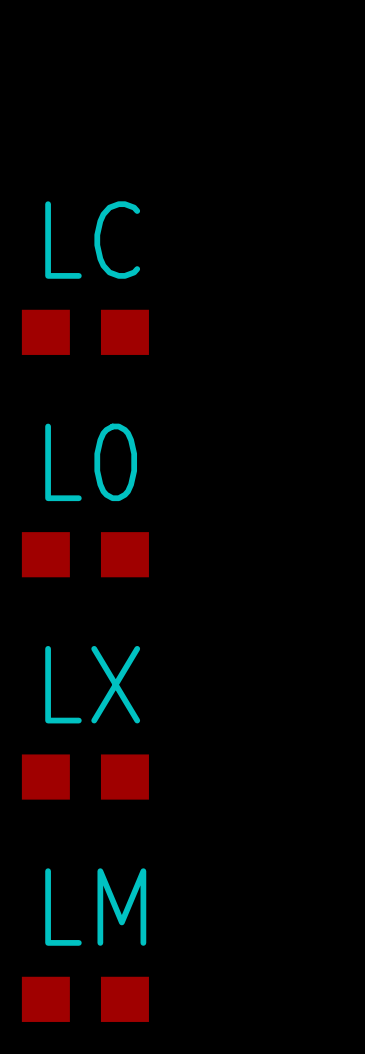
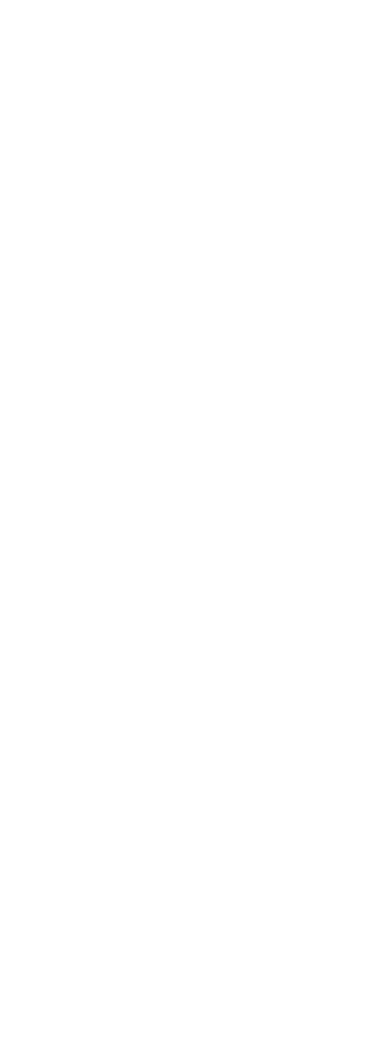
LC: (85, 332) -> none
L0: (85, 554) -> none
LX: (85, 777) -> none
LM: (85, 999) -> none

